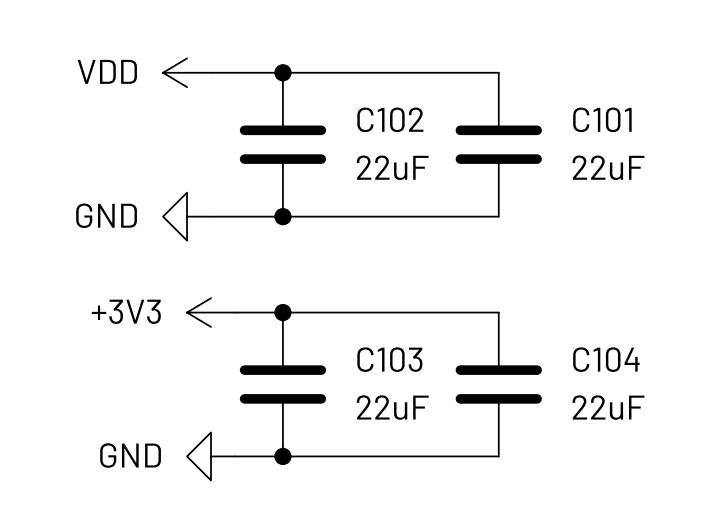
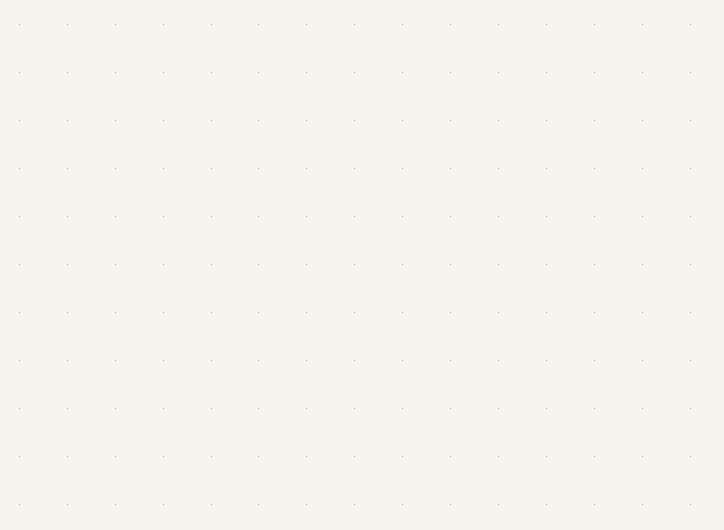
power symbol: VDD (187, 72) -> none
wire: (211, 72) (498, 72) -> none
junction: (282, 72) -> none
C102: 22uF (282, 144) -> none
C101: 22uF (498, 144) -> none
power symbol: GND (187, 216) -> none
wire: (211, 216) (498, 216) -> none
junction: (282, 216) -> none
power symbol: +3V3 (211, 312) -> none
wire: (234, 312) (498, 312) -> none
junction: (282, 312) -> none
C103: 22uF (282, 384) -> none
C104: 22uF (498, 384) -> none
power symbol: GND (211, 456) -> none
wire: (234, 456) (498, 456) -> none
junction: (282, 456) -> none

